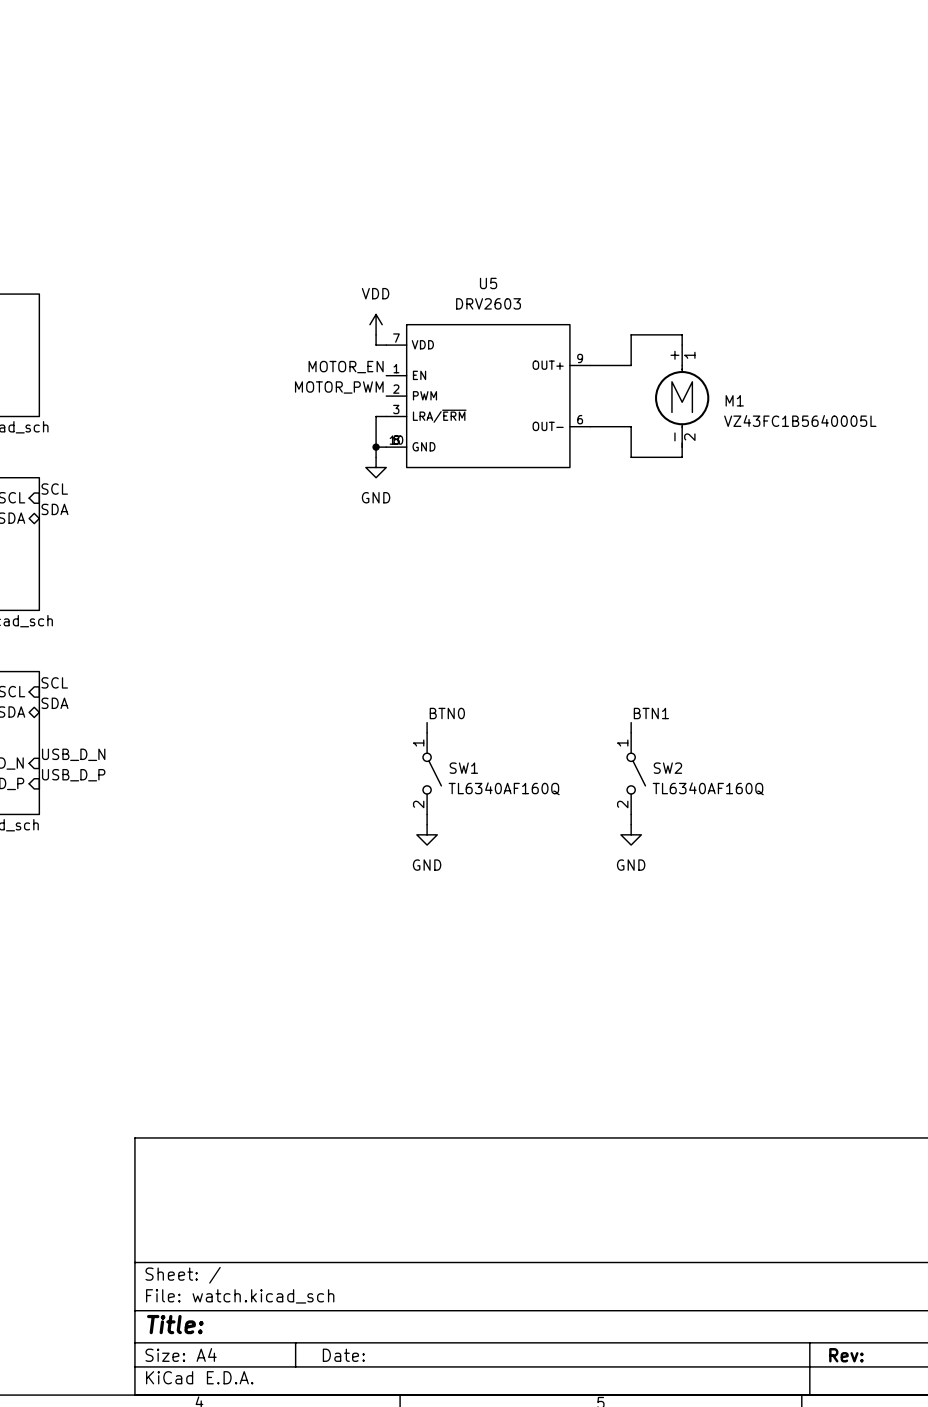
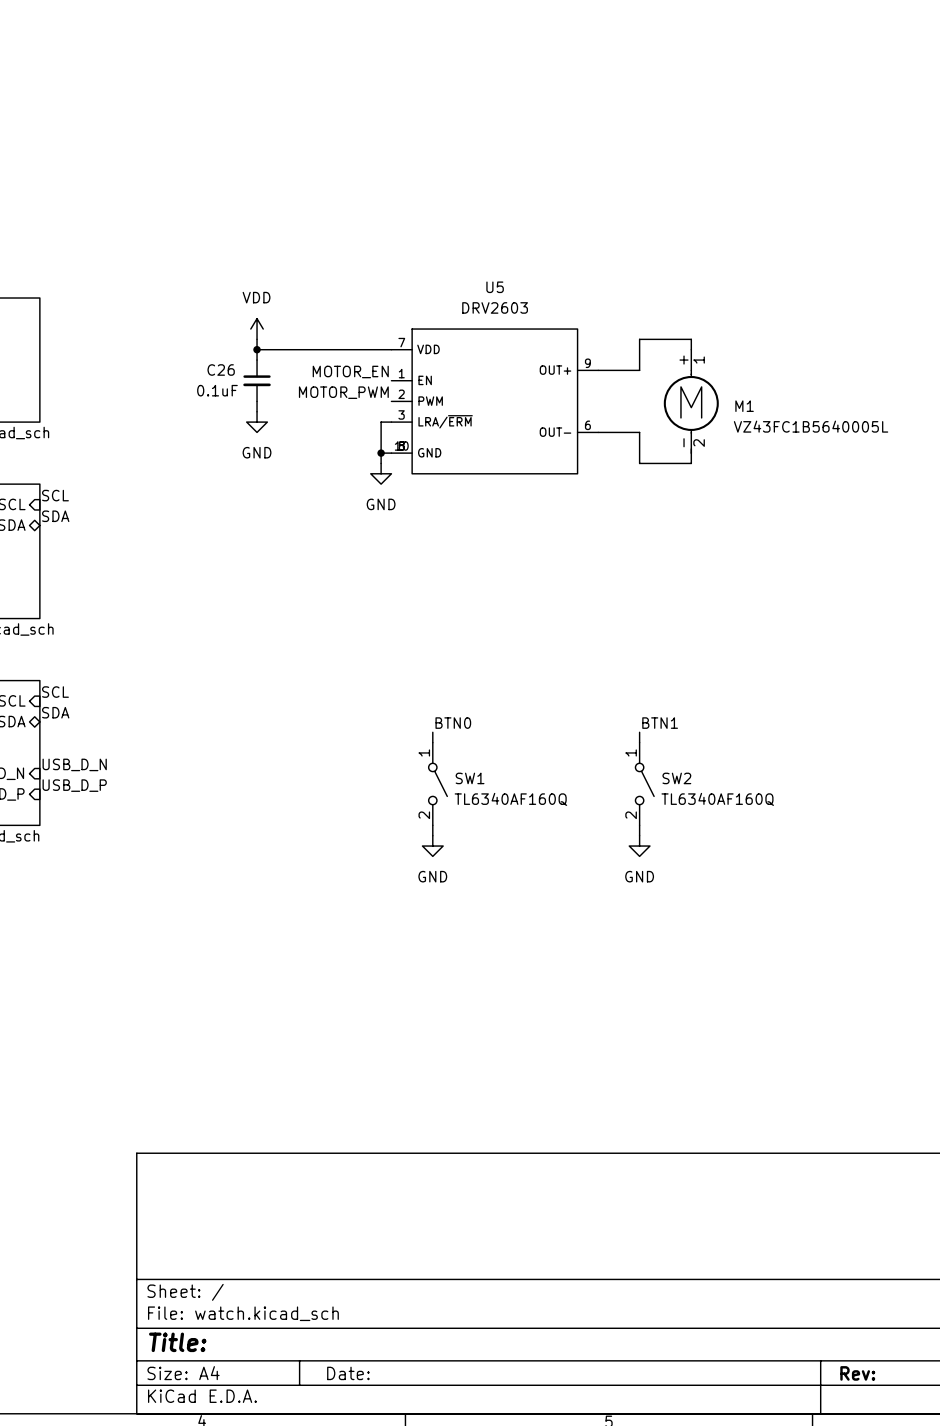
power symbol position: VDD (376, 324) -> VDD (257, 329)
wire: none -> (257, 339) (257, 360)
wire: (376, 334) (376, 345) -> (257, 349) (381, 349)
junction: none -> (257, 349)
C26: none -> 0.1uF (257, 380)
wire: none -> (257, 401) (257, 411)
power symbol: none -> GND (257, 422)

